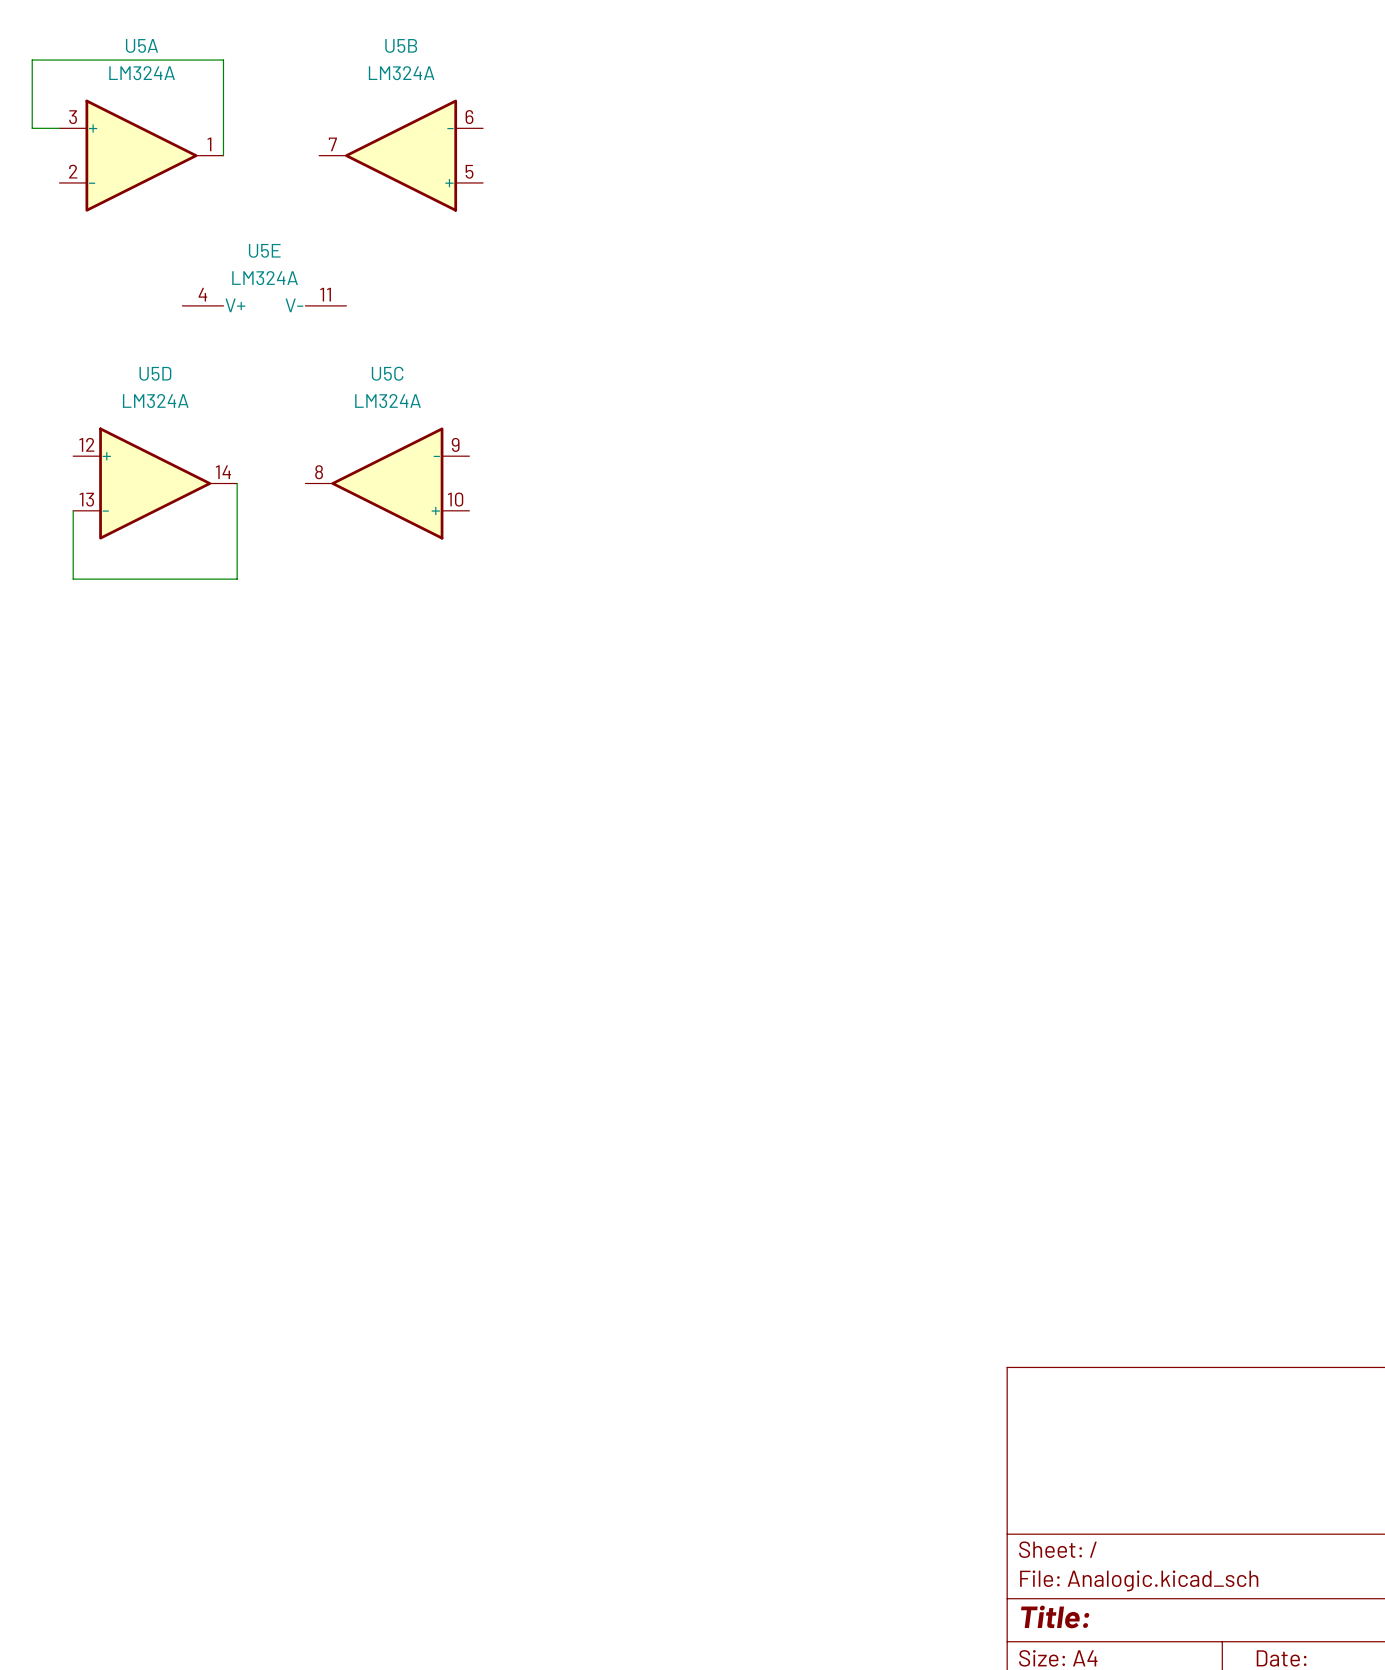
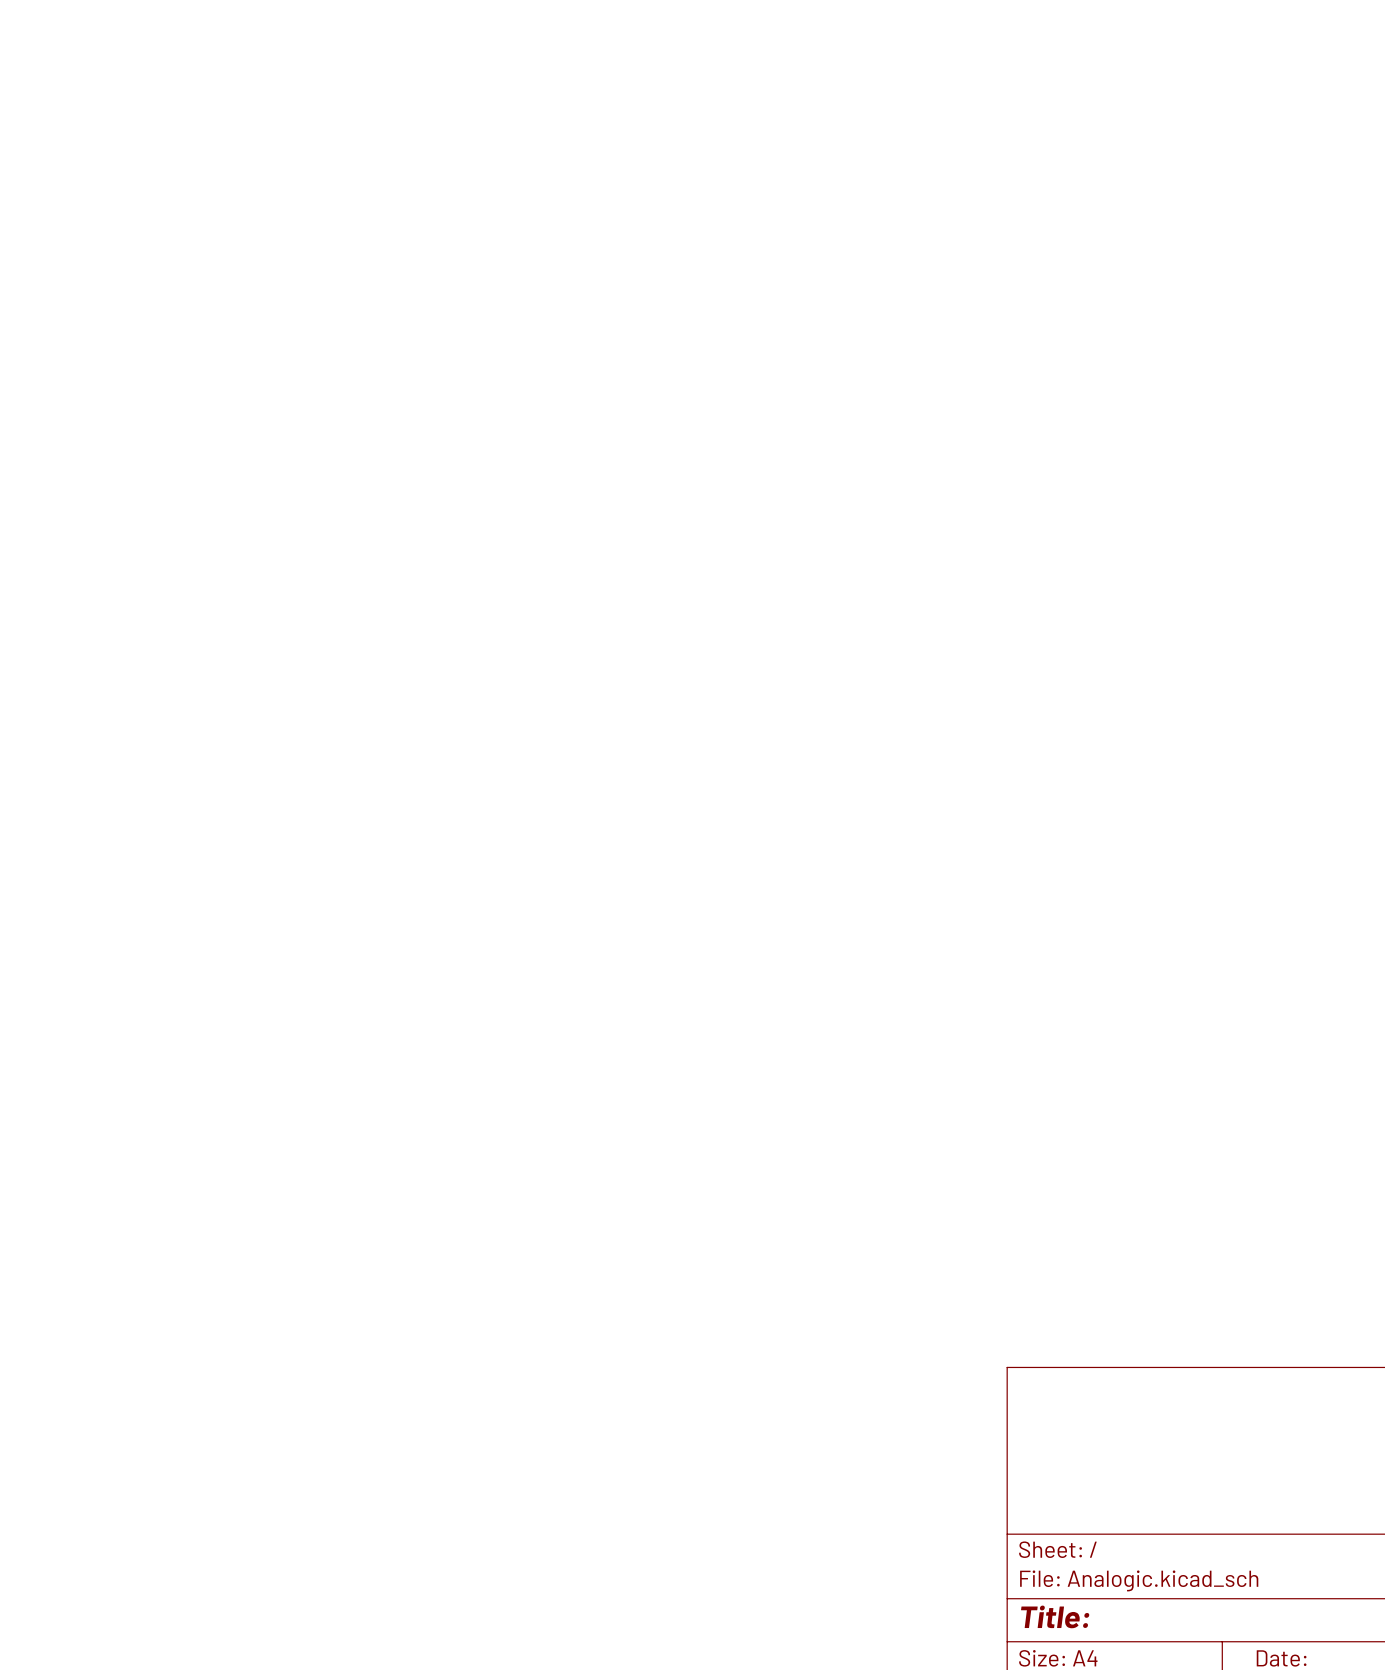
wire: (59, 128) (32, 128) (32, 60) (223, 60) (223, 155) -> none
U5A: LM324A (141, 155) -> none
U5B: LM324A (401, 155) -> none
U5E: LM324A (264, 305) -> none
U5D: LM324A (155, 483) -> none
wire: (237, 483) (237, 579) (73, 579) (73, 510) -> none
U5C: LM324A (387, 483) -> none

